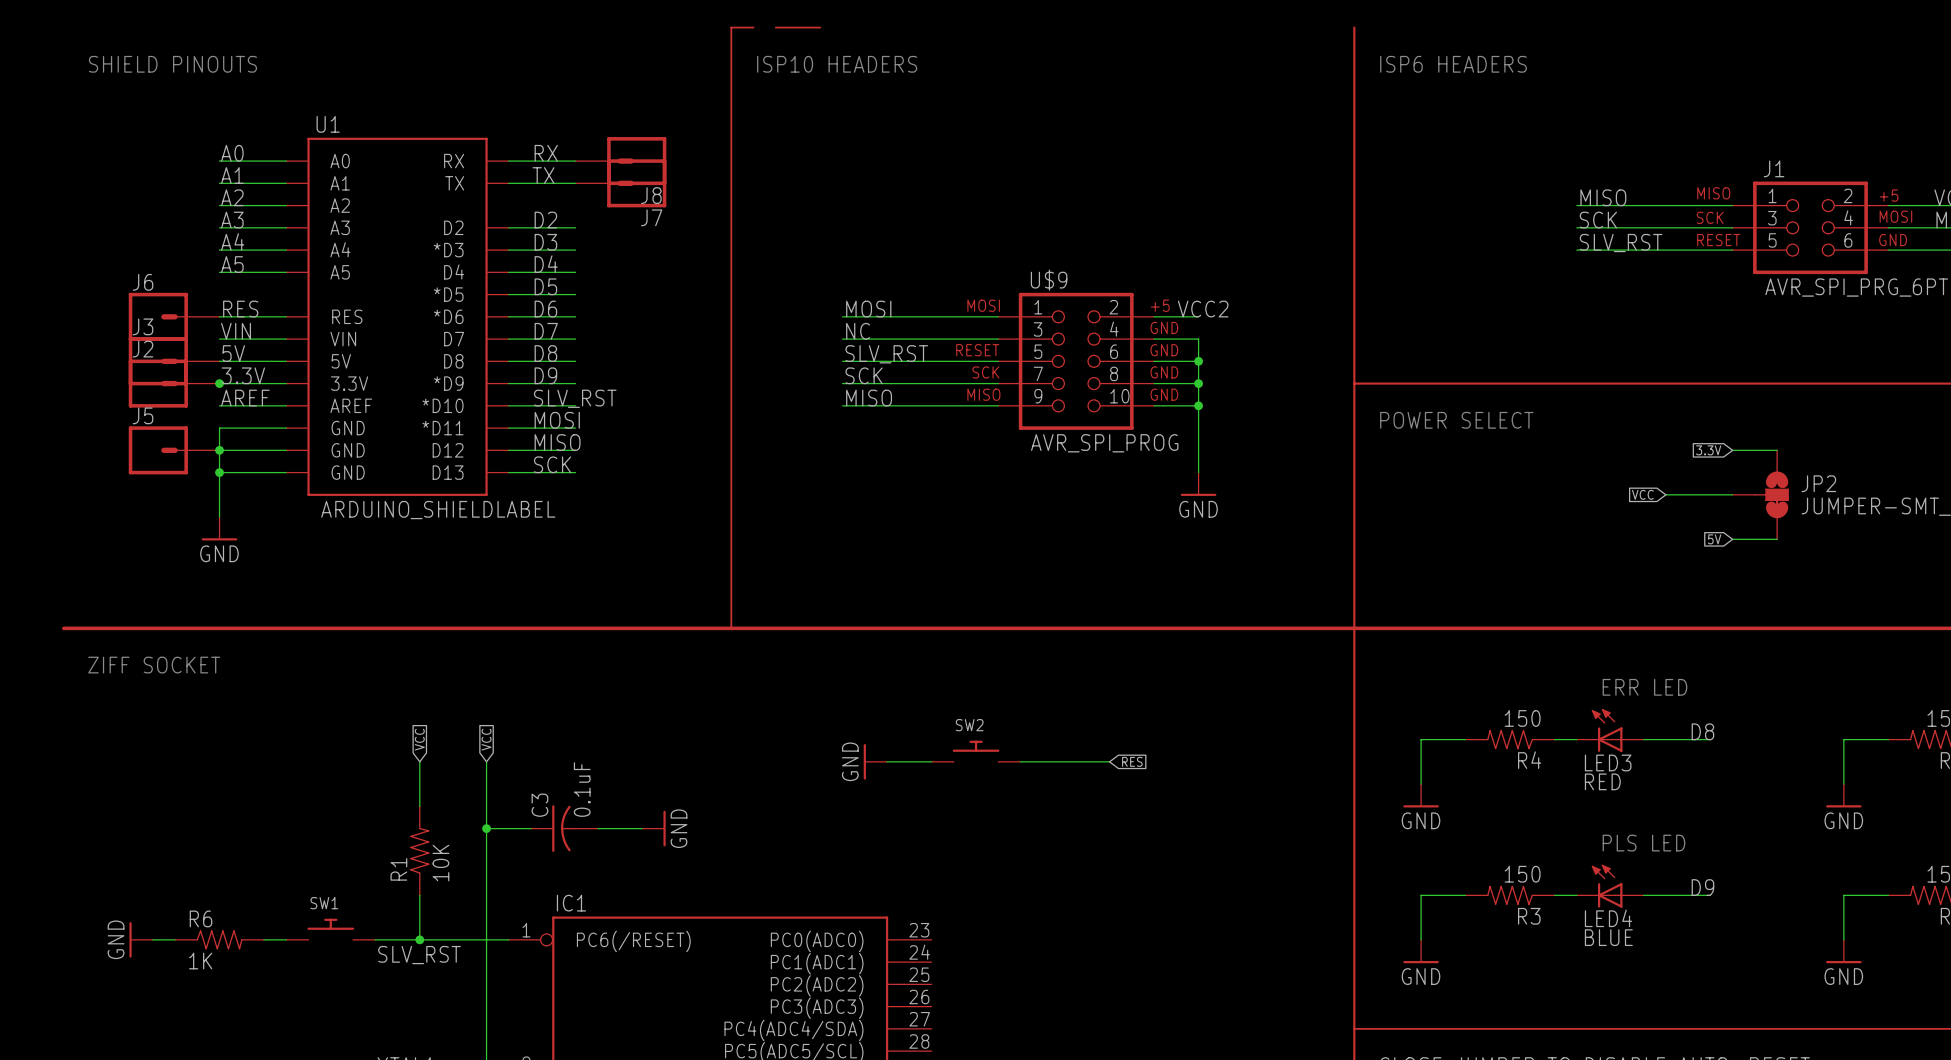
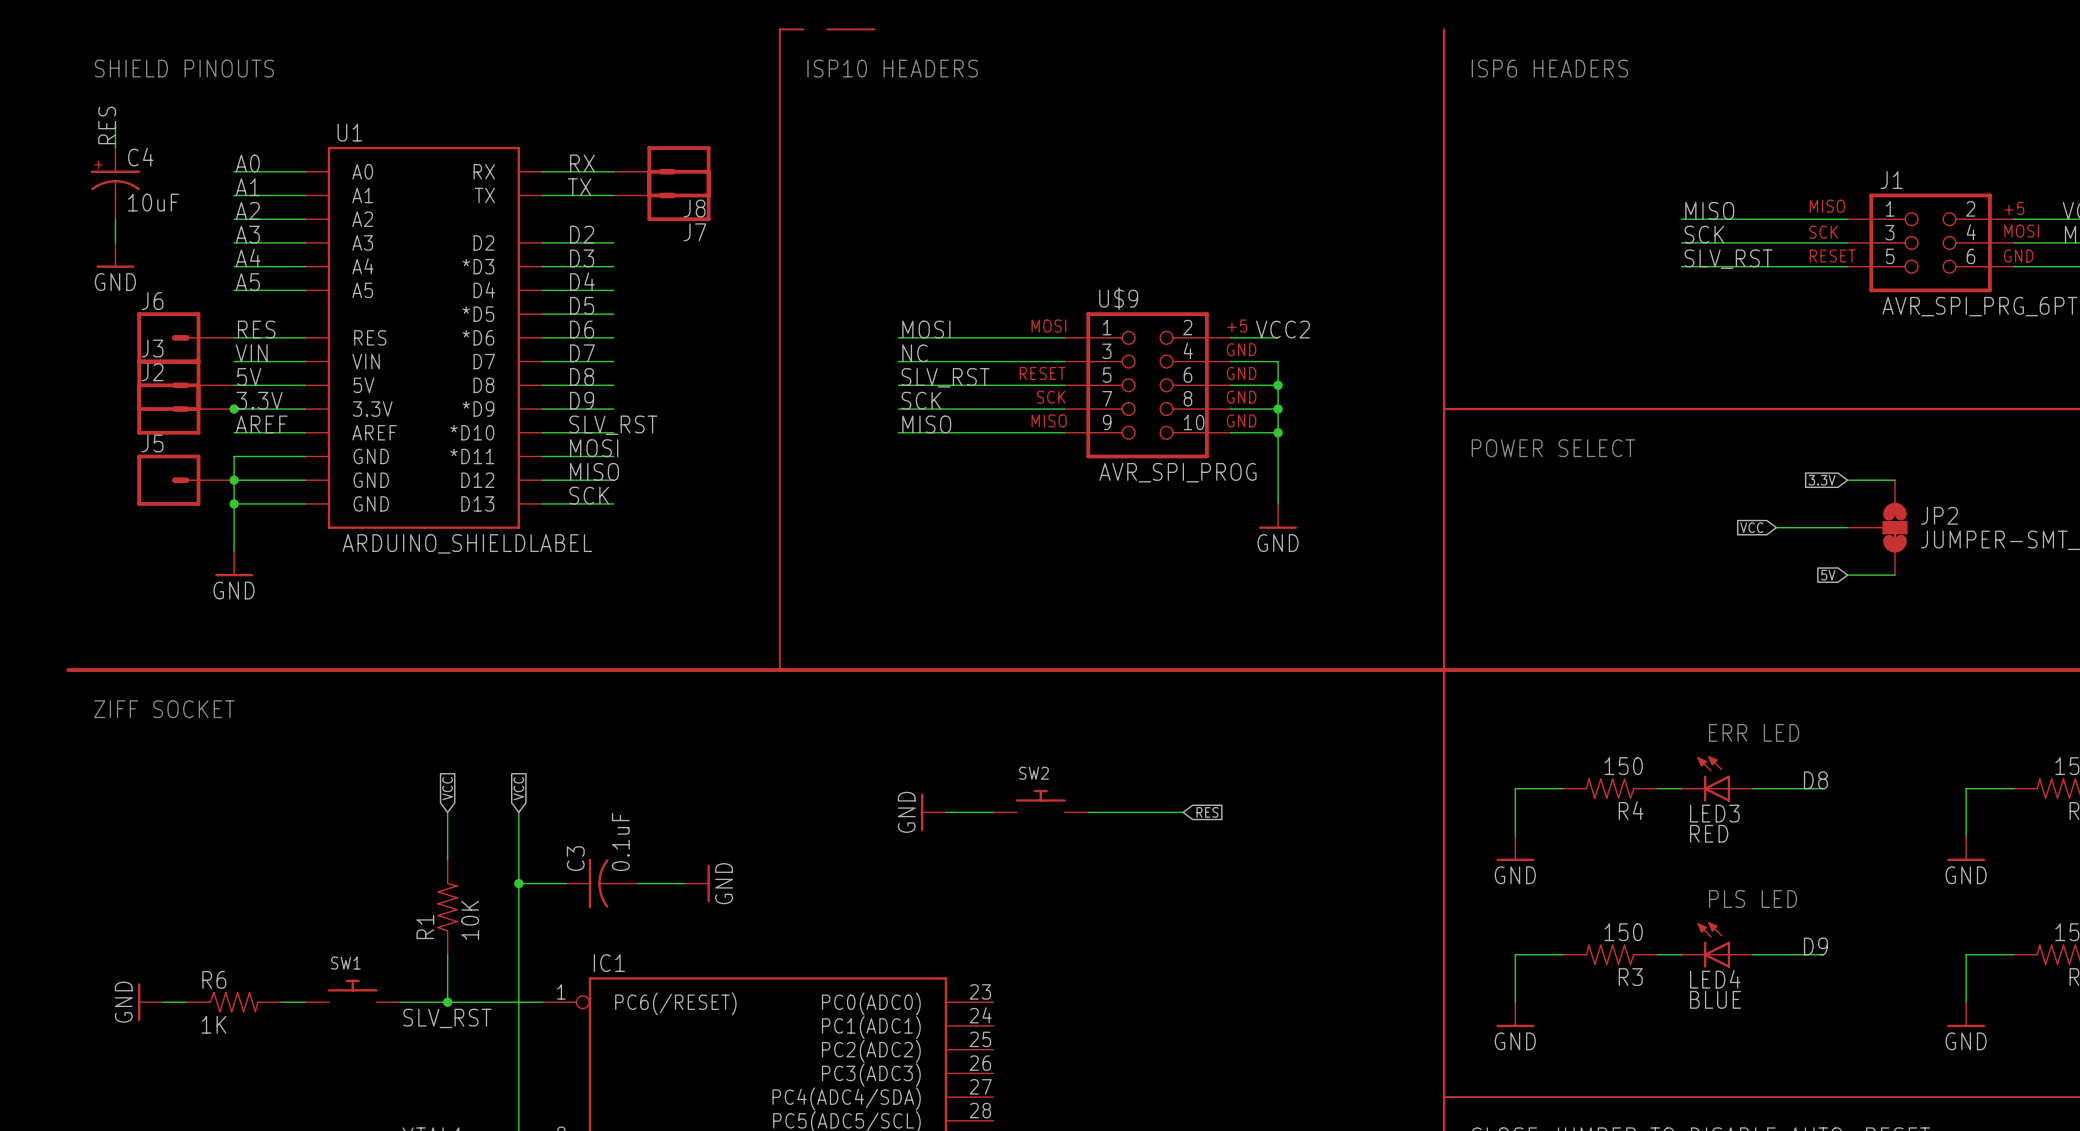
wire: none -> (115, 124) (115, 148)
label: none -> RES (107, 125)
C4: none -> 10uF (115, 183)
wire: none -> (115, 219) (115, 242)
power symbol: none -> GND (115, 255)

